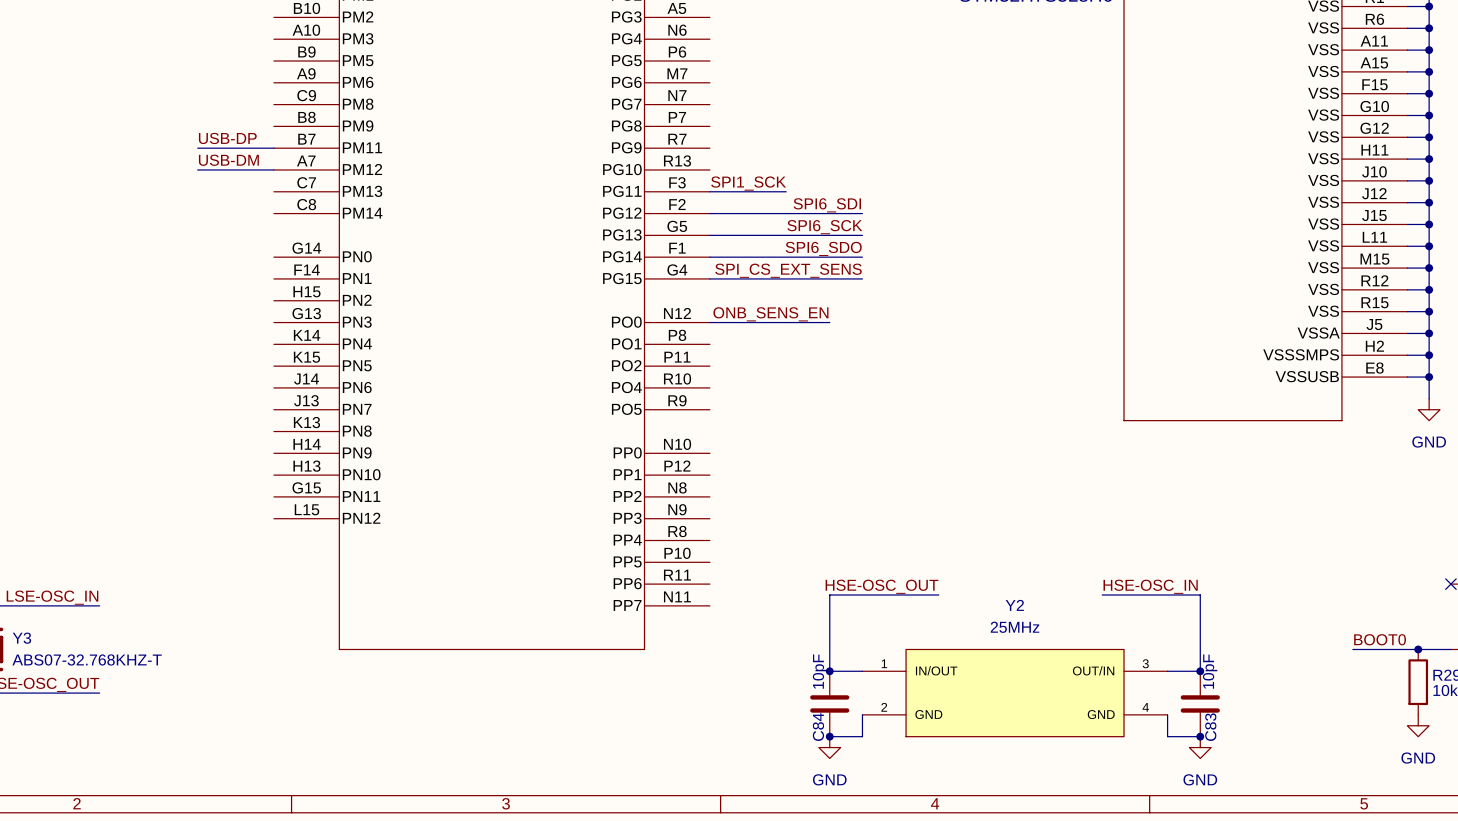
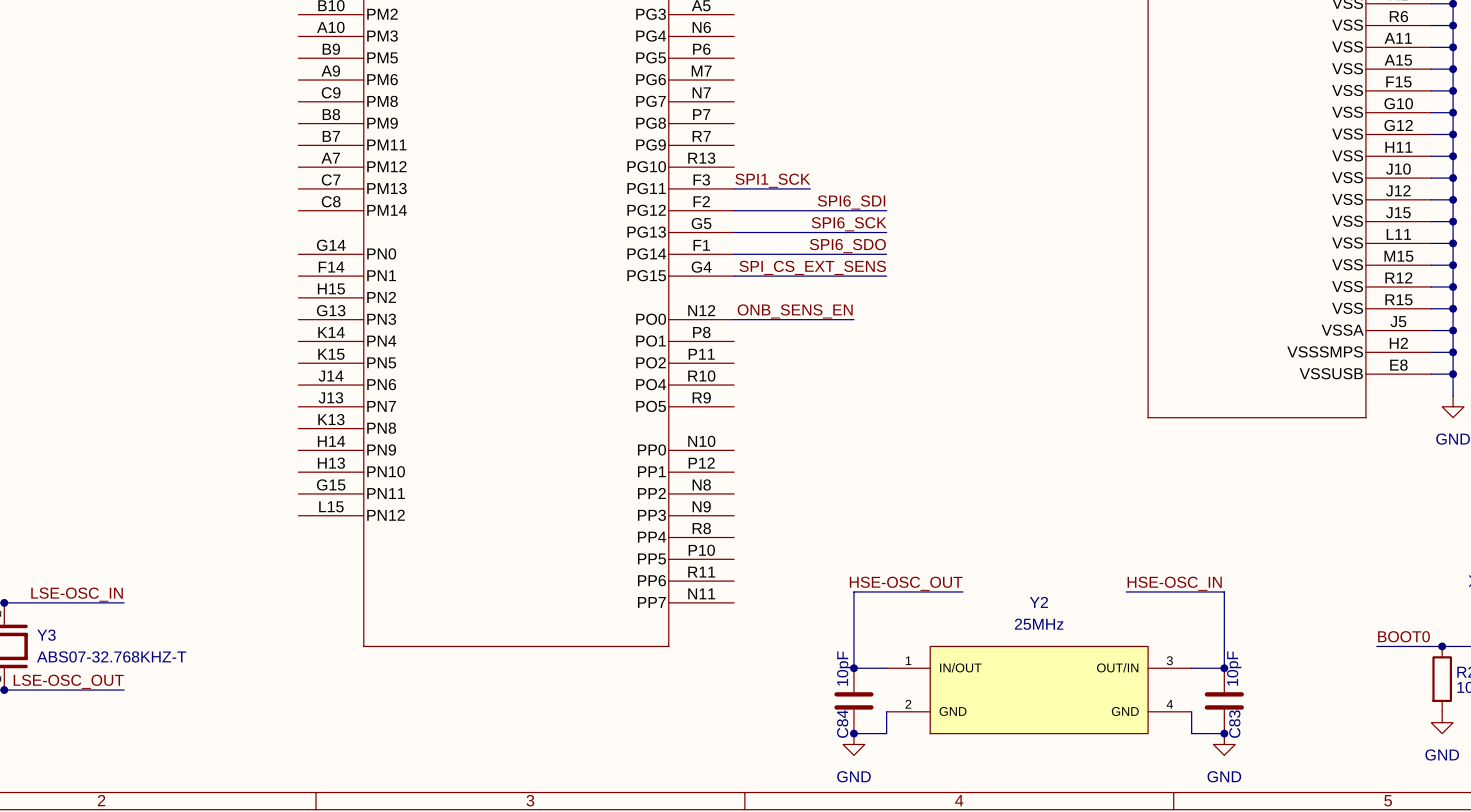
label: USB-DP (227, 138) -> none
wire: (197, 148) (273, 148) -> none
label: USB-DM (228, 160) -> none
wire: (197, 169) (273, 169) -> none

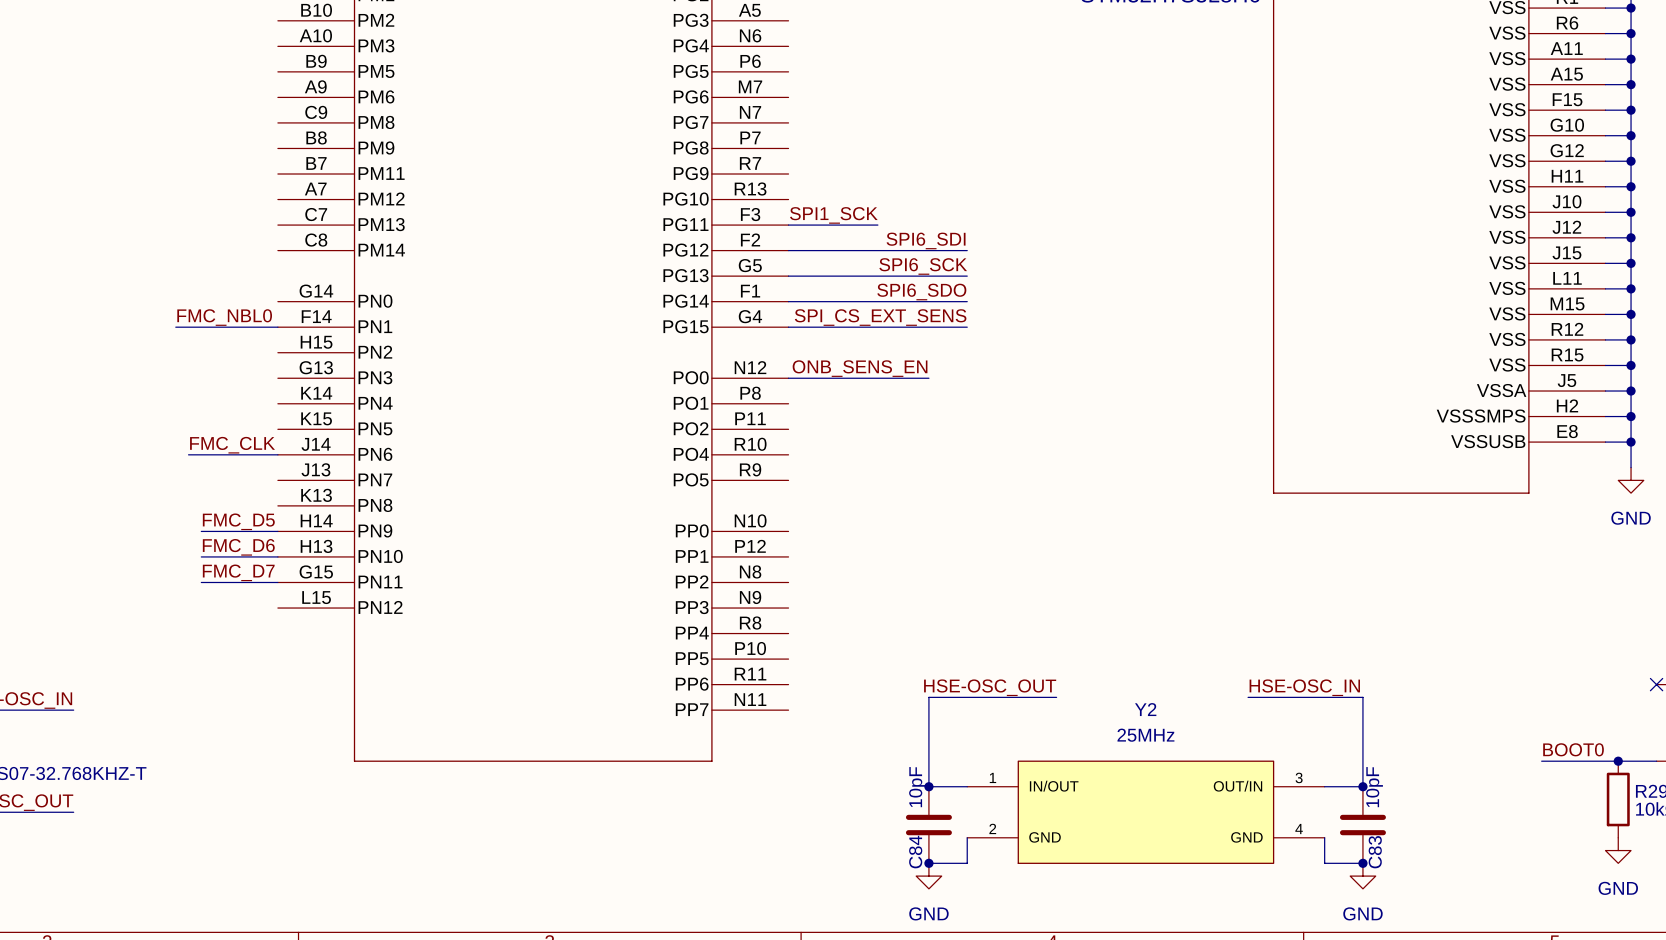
label: none -> FMC_NBL0 (224, 317)
wire: none -> (175, 327) (277, 327)
label: none -> FMC_CLK (232, 445)
wire: none -> (188, 454) (277, 454)
label: none -> FMC_D5 (238, 521)
wire: none -> (201, 531) (277, 531)
label: none -> FMC_D6 (238, 547)
wire: none -> (201, 556) (277, 556)
label: none -> FMC_D7 (238, 572)
wire: none -> (201, 582) (277, 582)

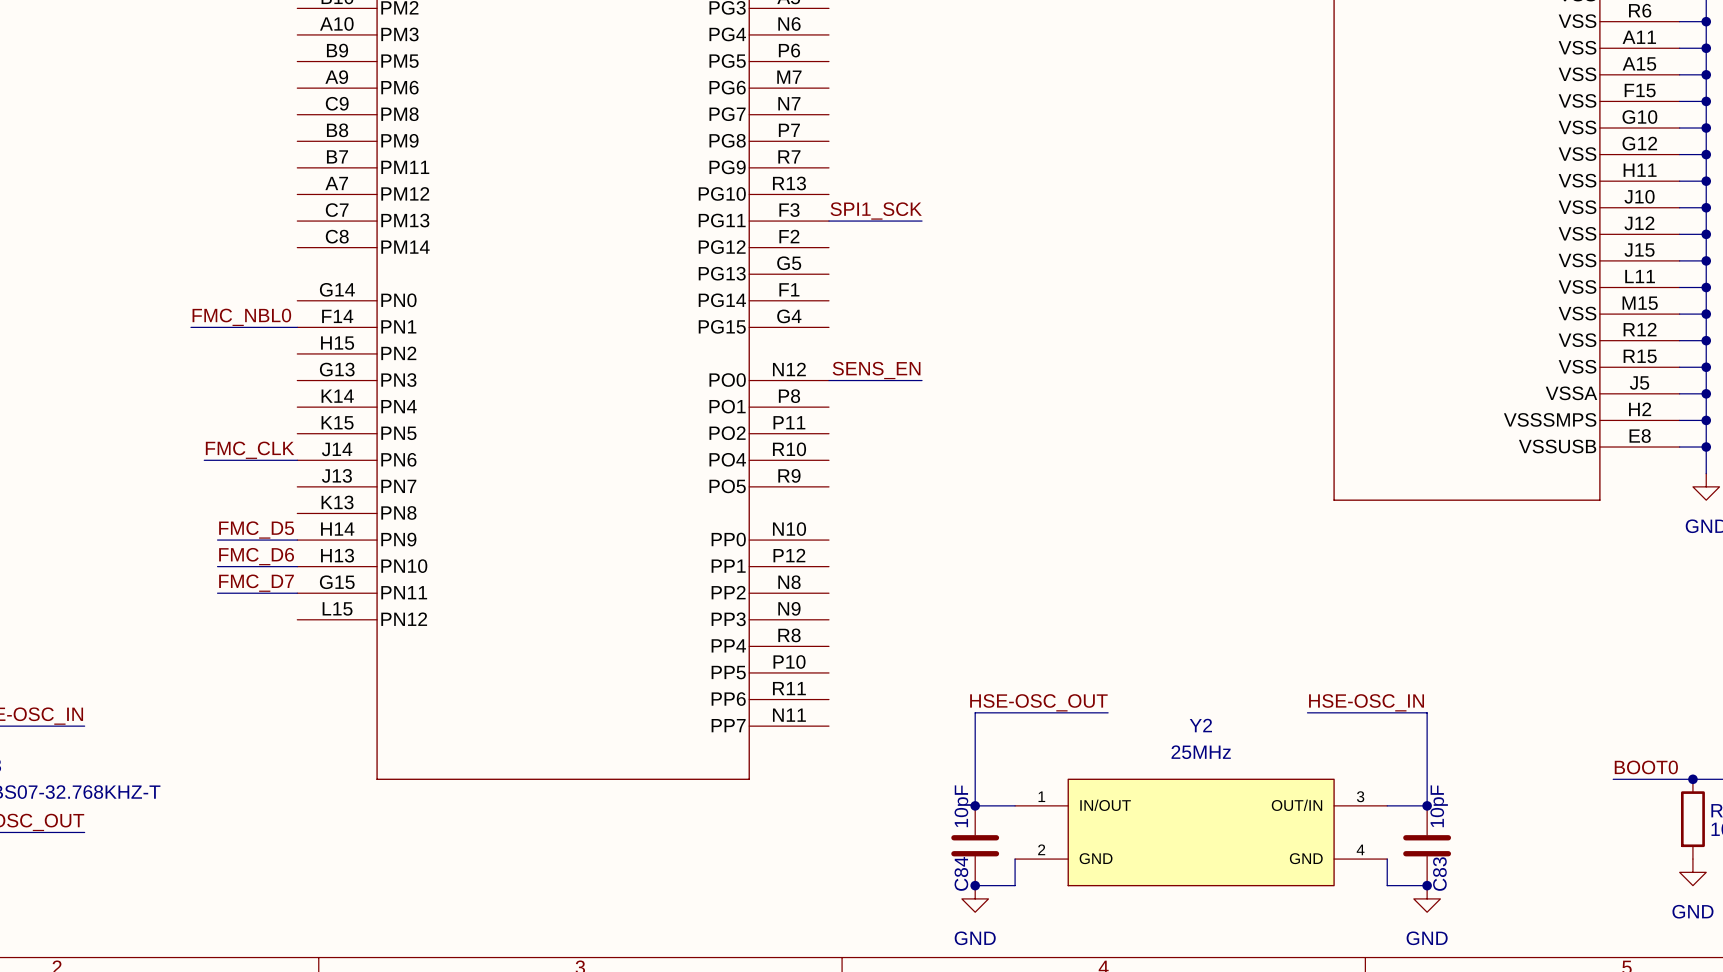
label: SPI6_SDI (926, 240) -> none
wire: (788, 250) (967, 250) -> none
label: SPI6_SCK (923, 266) -> none
wire: (788, 276) (967, 276) -> none
label: SPI6_SDO (921, 292) -> none
wire: (788, 301) (967, 301) -> none
label: SPI_CS_EXT_SENS (880, 317) -> none
wire: (788, 327) (967, 327) -> none
label: ONB_SENS_EN (860, 368) -> SENS_EN (876, 370)
wire: (877, 378) (928, 378) -> none

